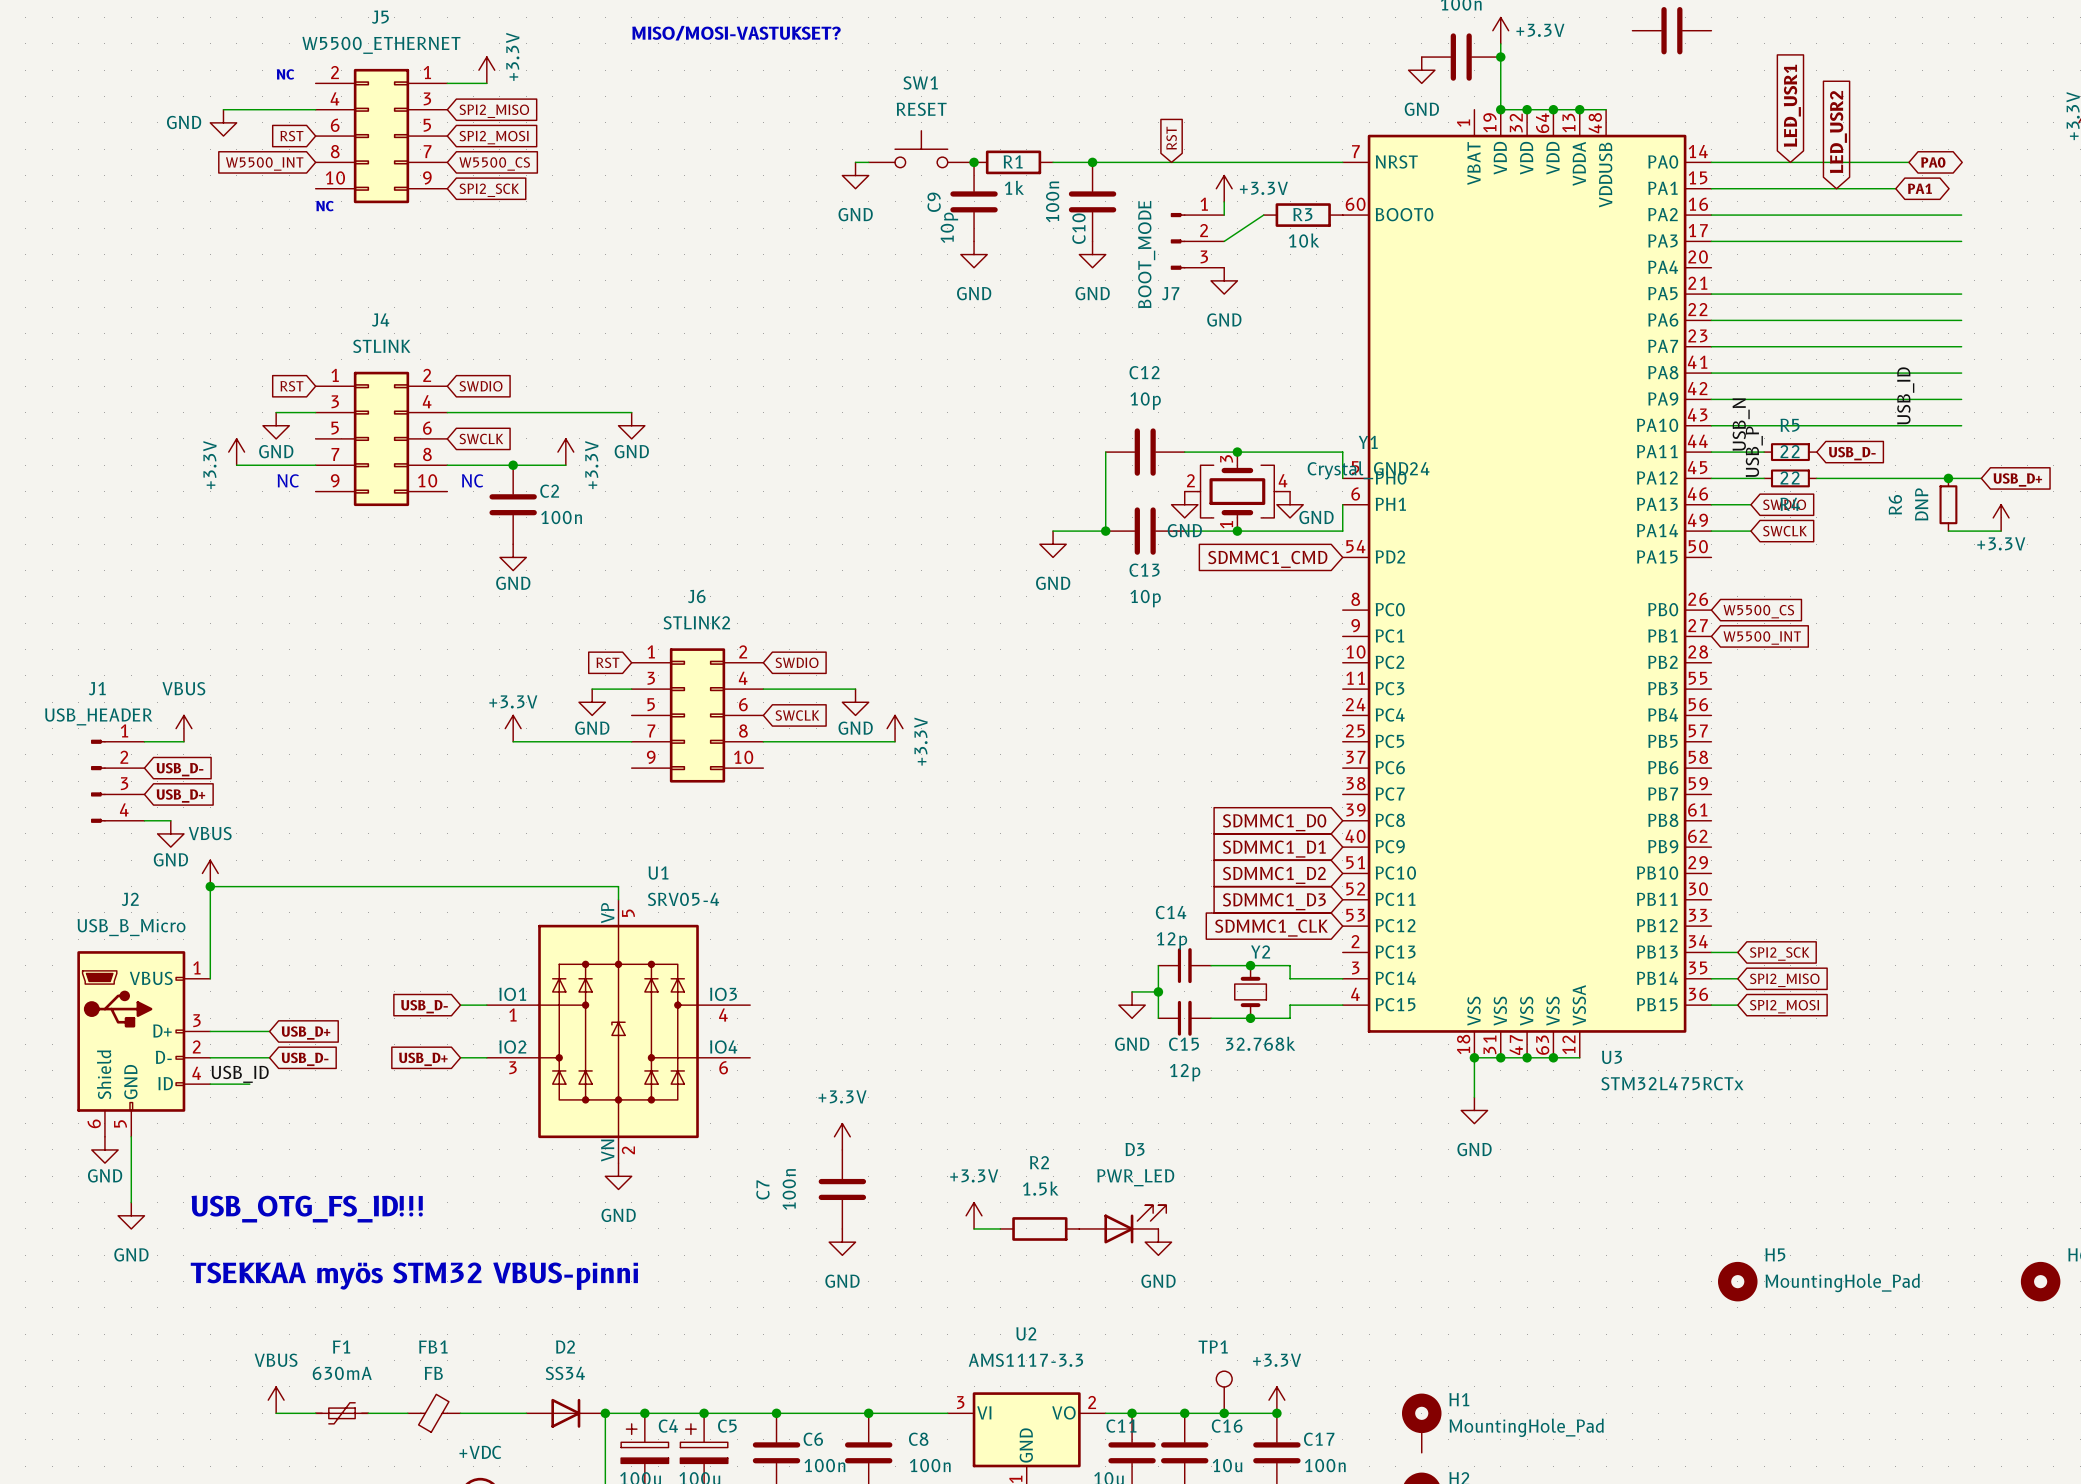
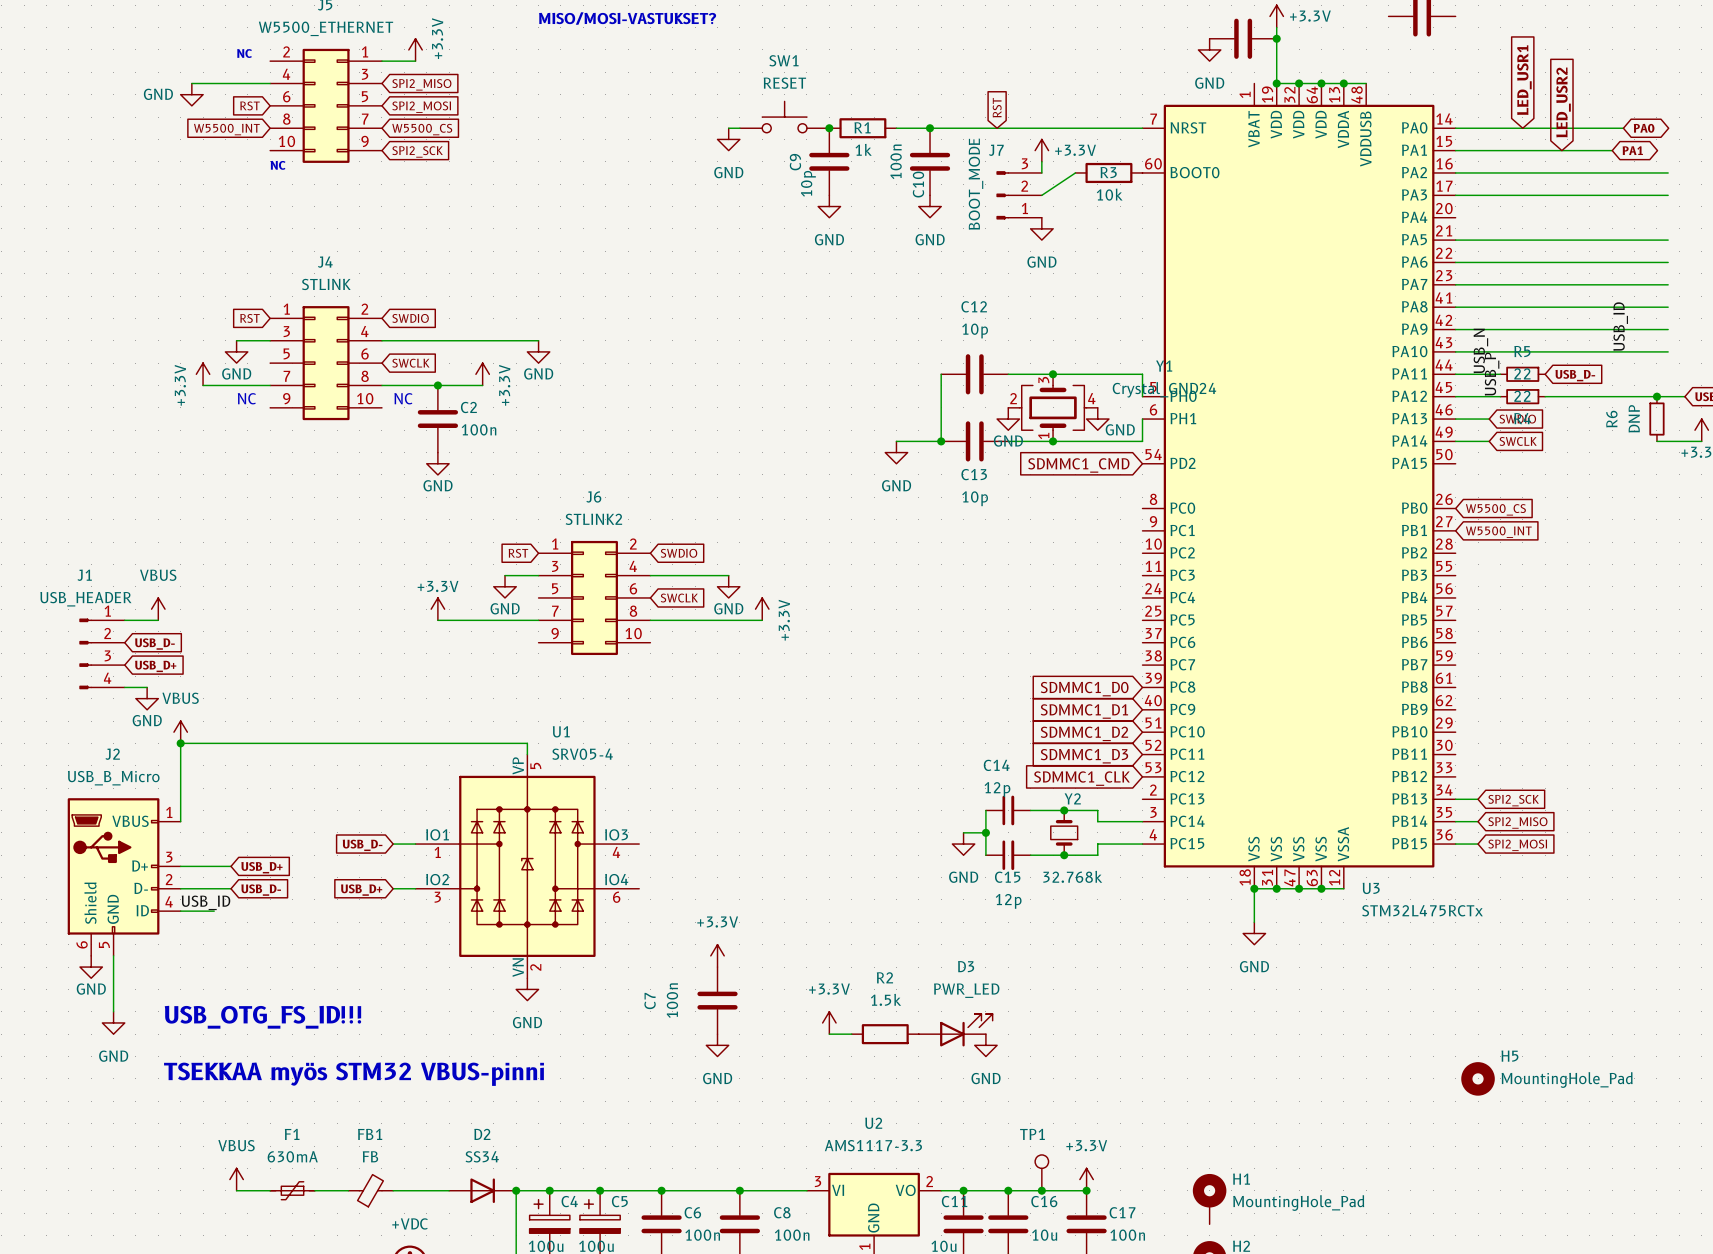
J7 flip: as is (1178, 241) -> up-down (1002, 195)

